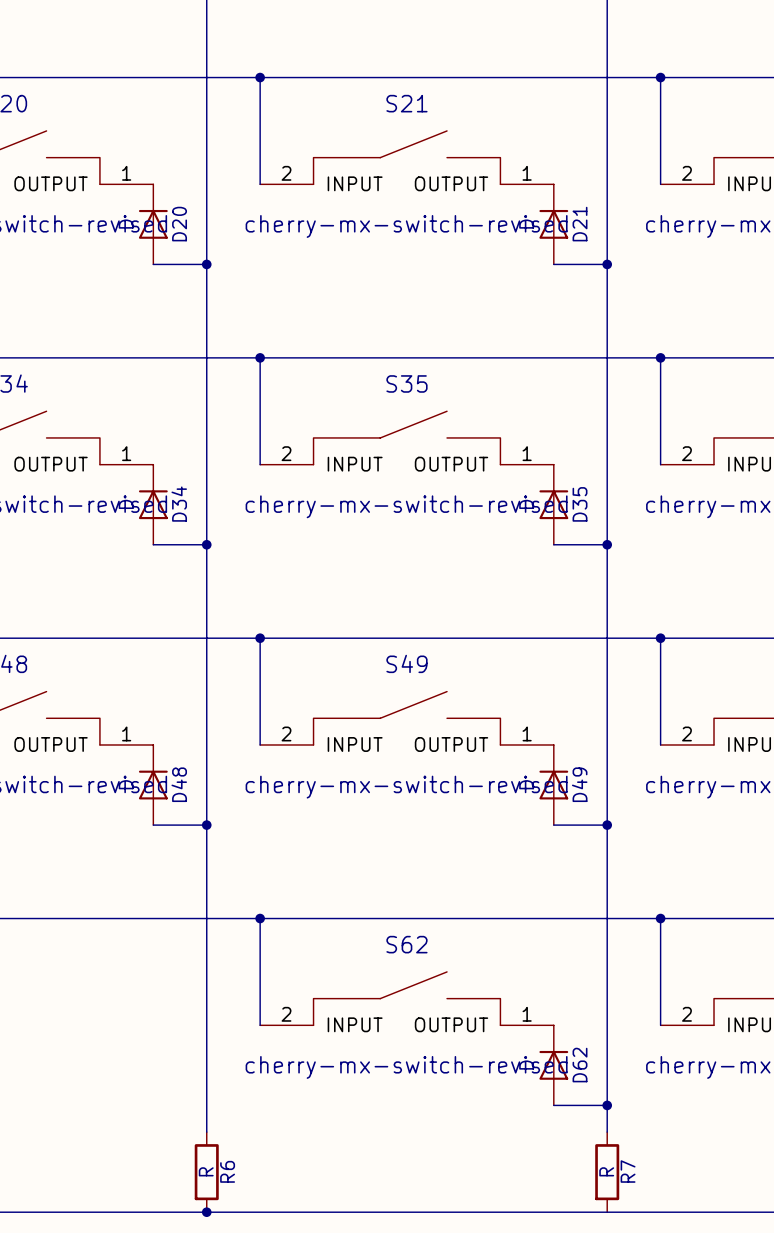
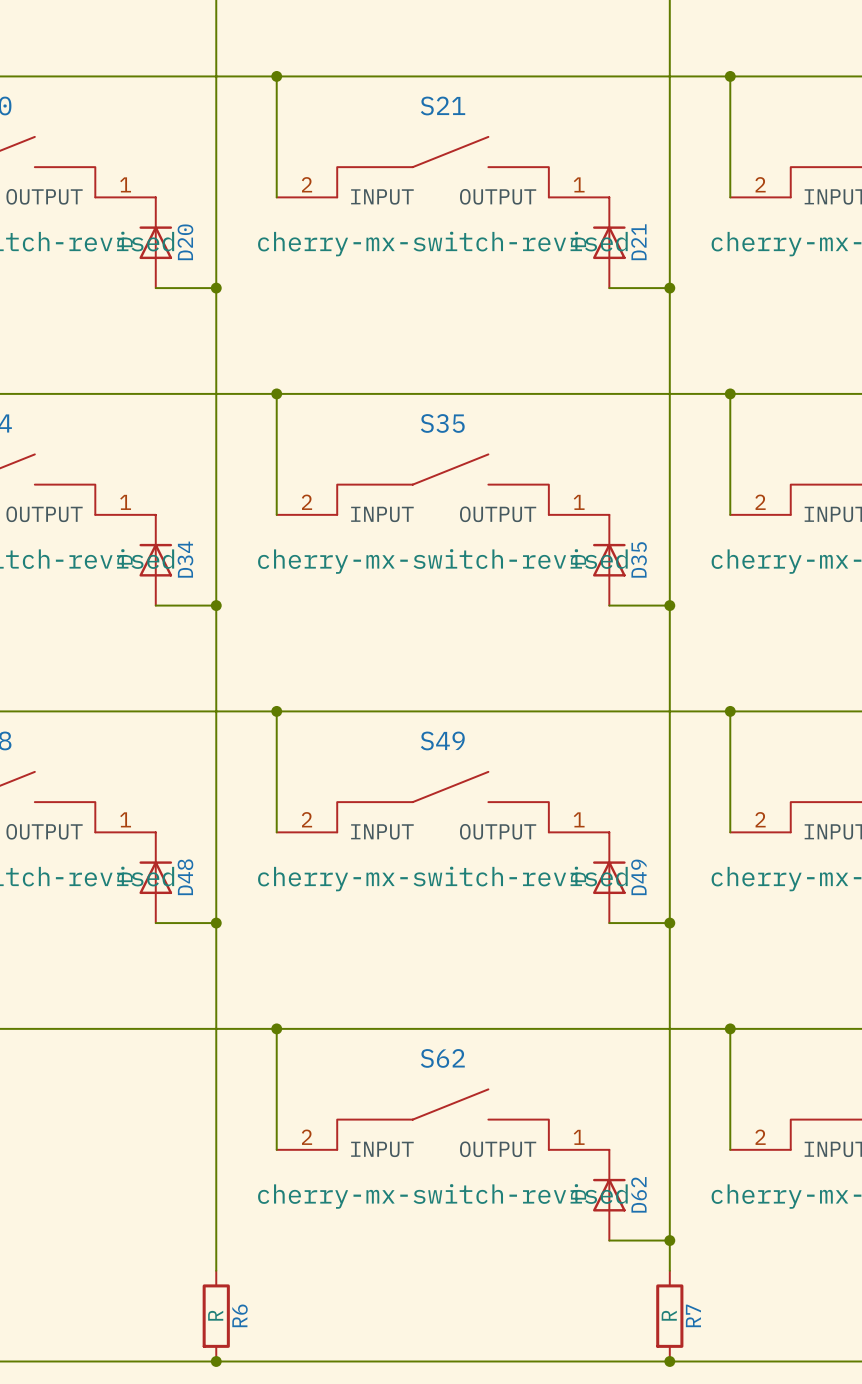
junction: none -> (669, 1361)

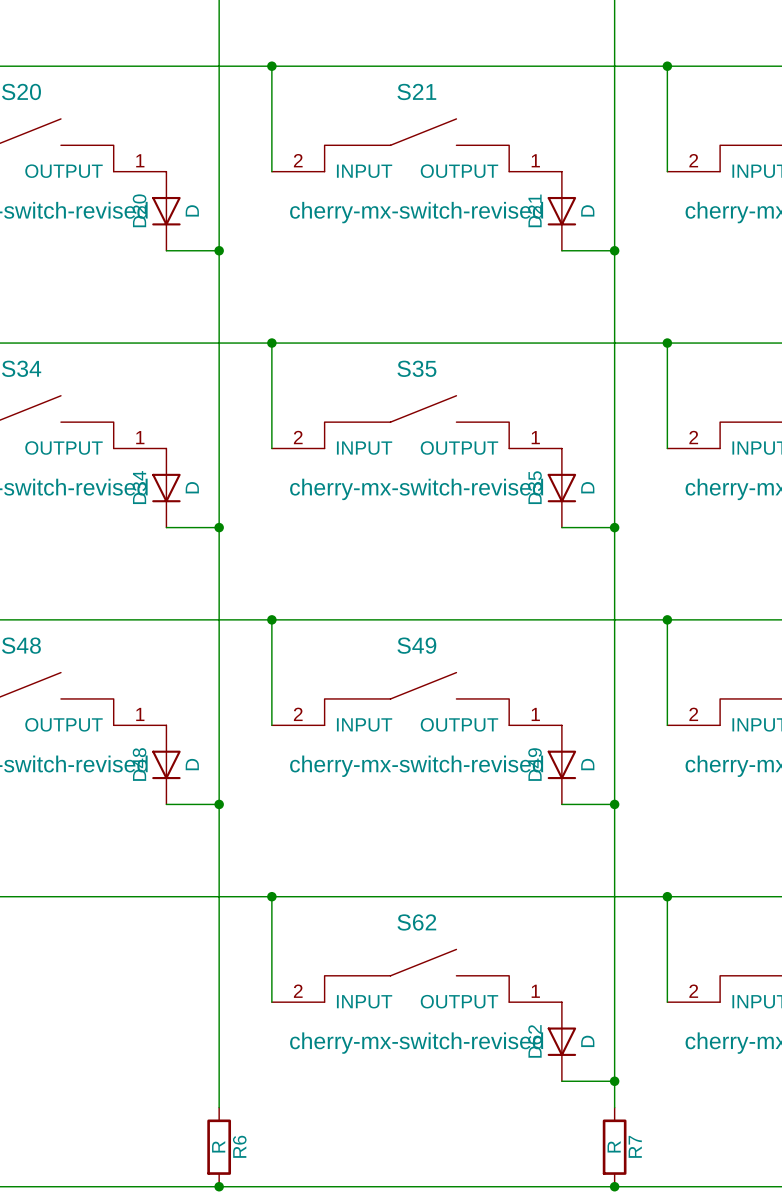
D20 rotation: 0° (155, 242) -> 180° (166, 211)
D21 rotation: 0° (609, 242) -> 180° (561, 211)
D34 rotation: 0° (155, 560) -> 180° (166, 488)
D35 rotation: 0° (609, 560) -> 180° (561, 488)
D48 rotation: 0° (155, 877) -> 180° (166, 764)
D49 rotation: 0° (609, 877) -> 180° (561, 764)
D62 rotation: 0° (609, 1195) -> 180° (561, 1041)

